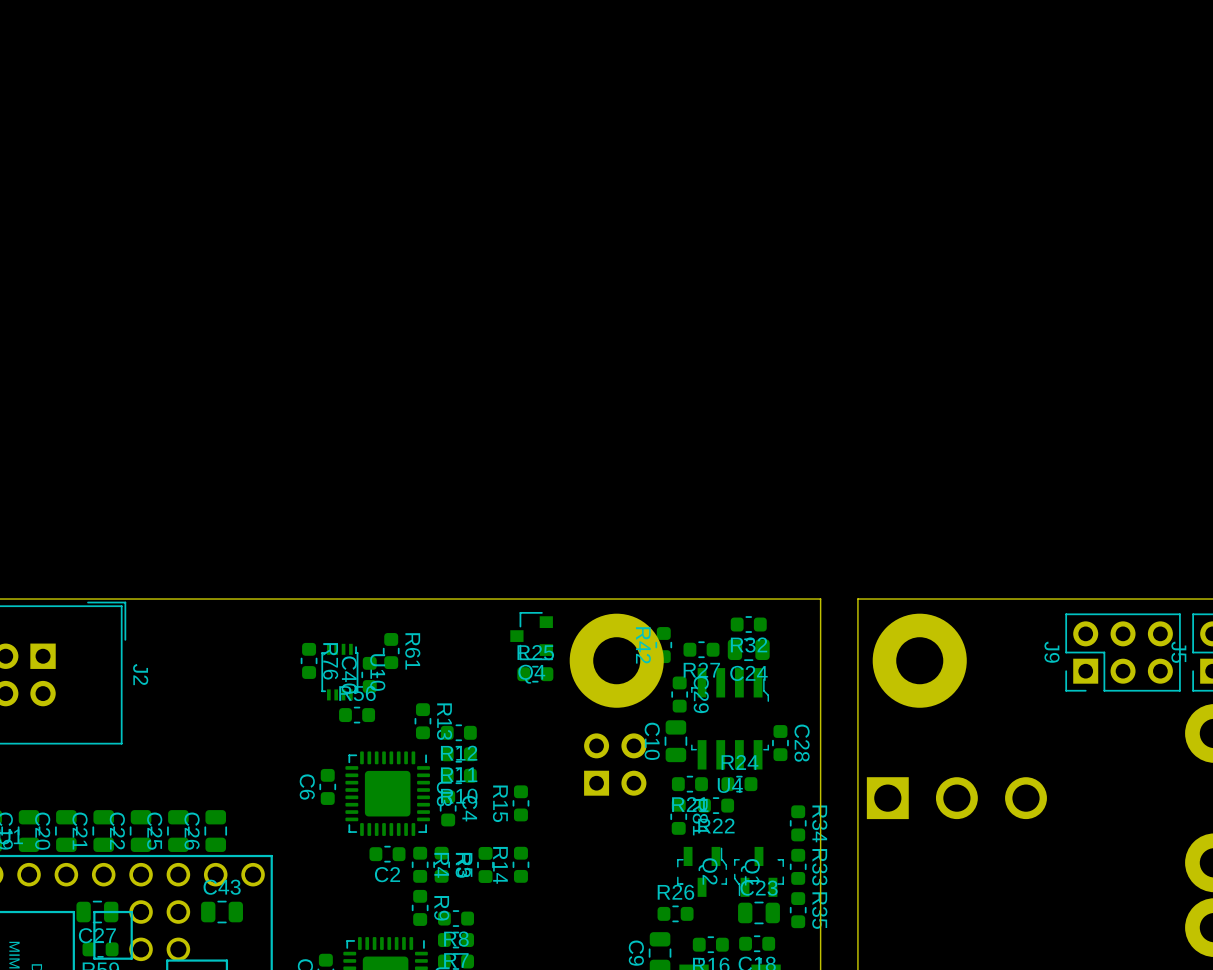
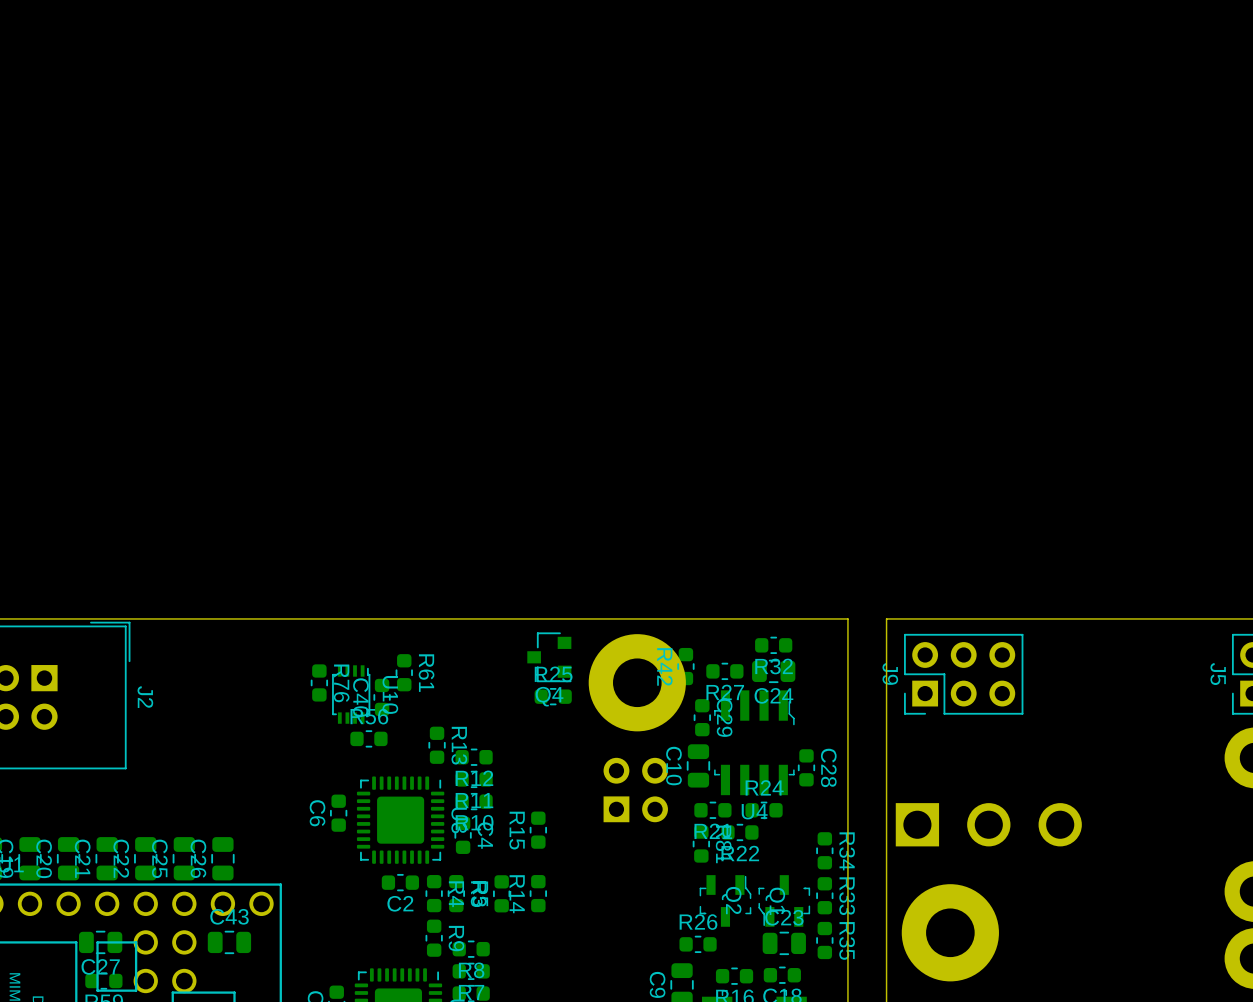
J9 position: (1123, 652) -> (963, 674)
part position: (919, 660) -> (950, 932)

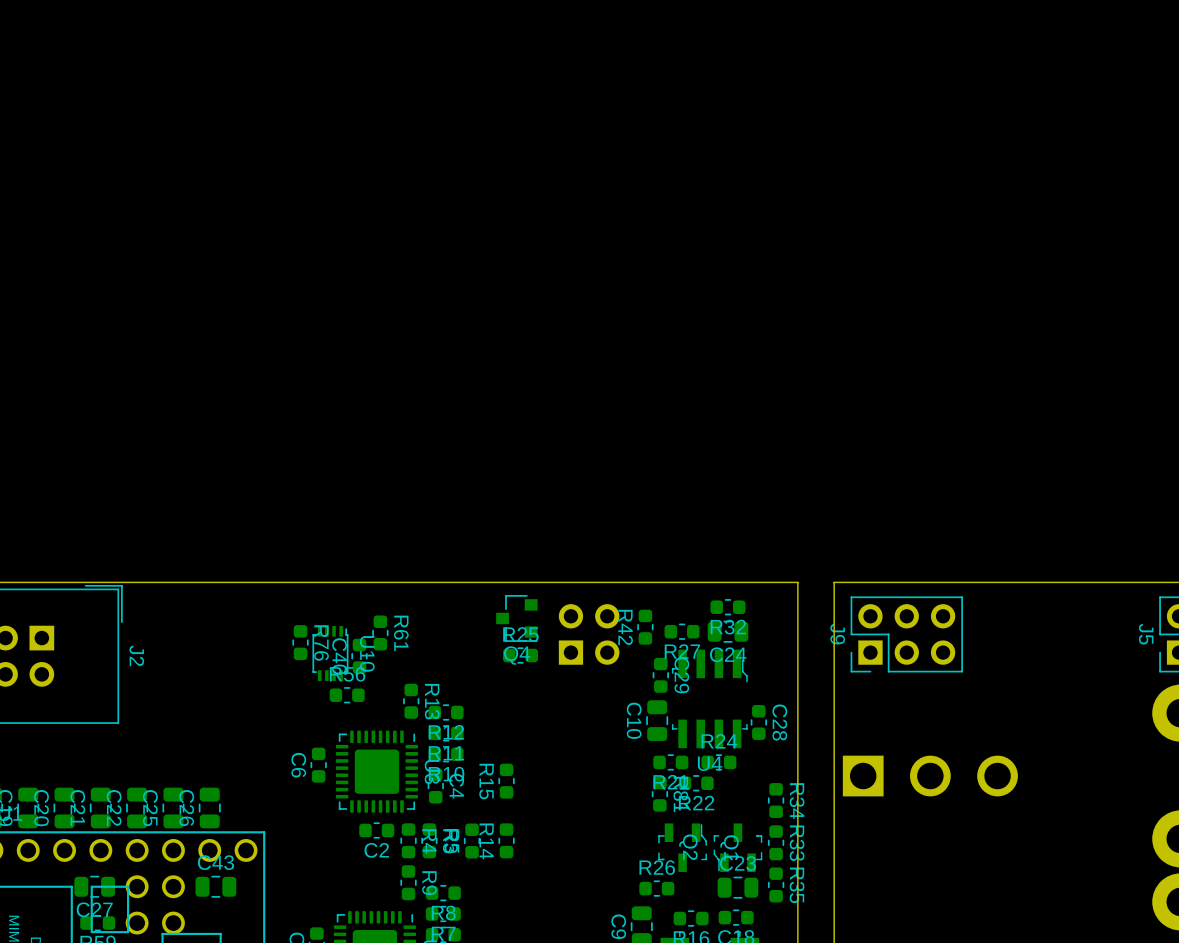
part footprint: [588, 634, 686, 732] -> [558, 604, 620, 665]
part: (635, 790) -> none
part: (950, 932) -> none

